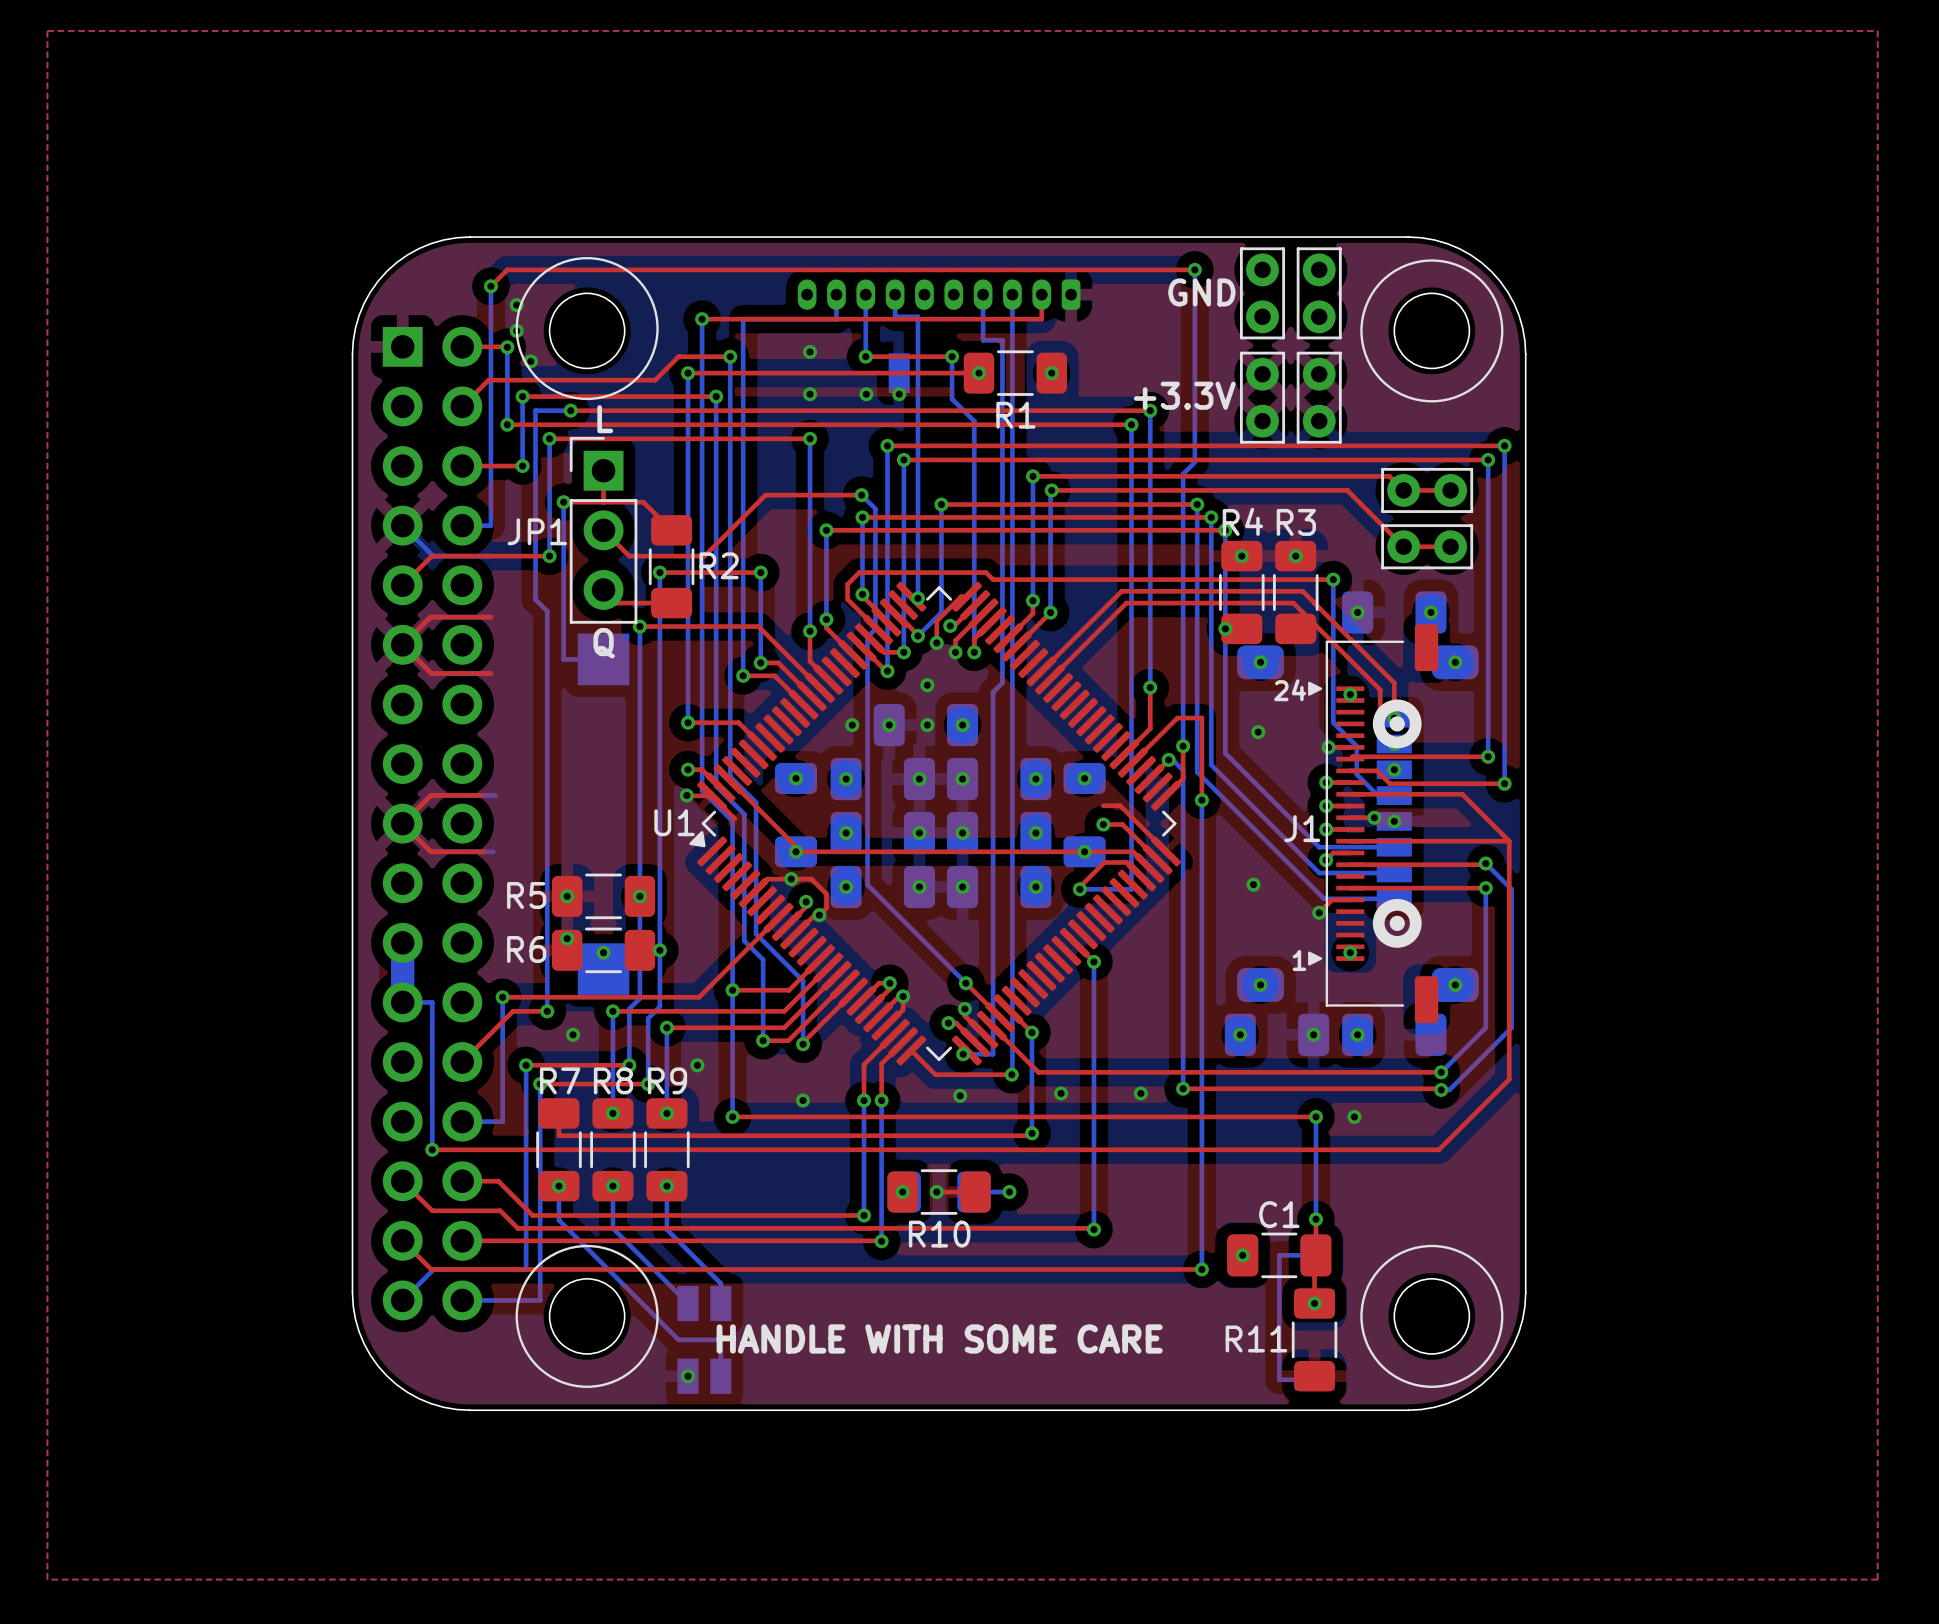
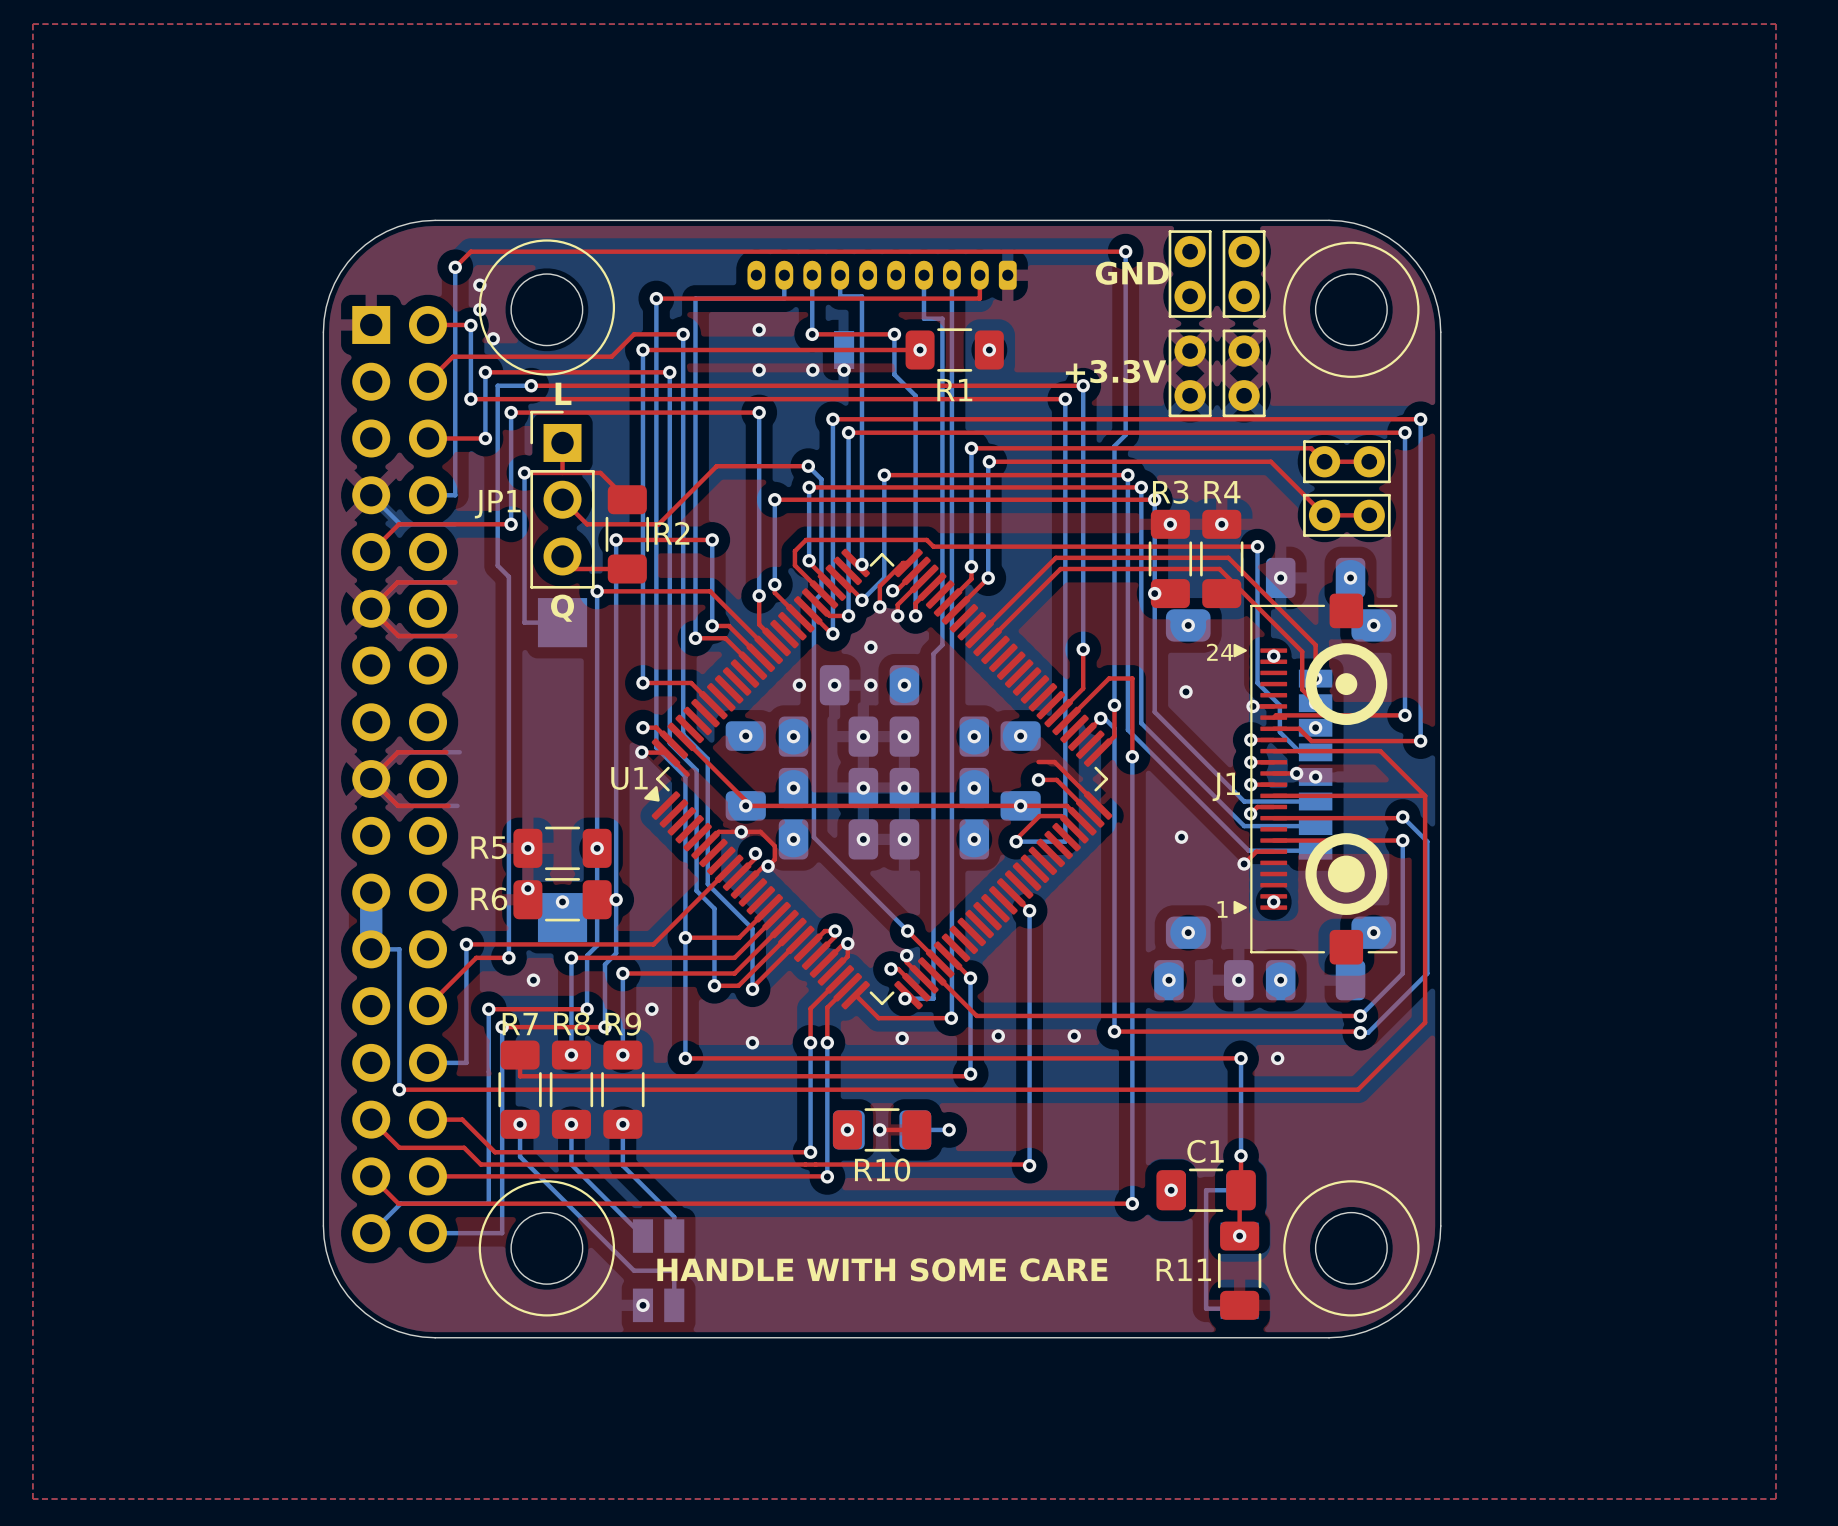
R4 name: R4 (1242, 521) -> R3 (1170, 492)
R3 name: R3 (1296, 522) -> R4 (1222, 492)
J1 footprint: [1308, 624, 1439, 1024] -> [1233, 593, 1398, 965]

